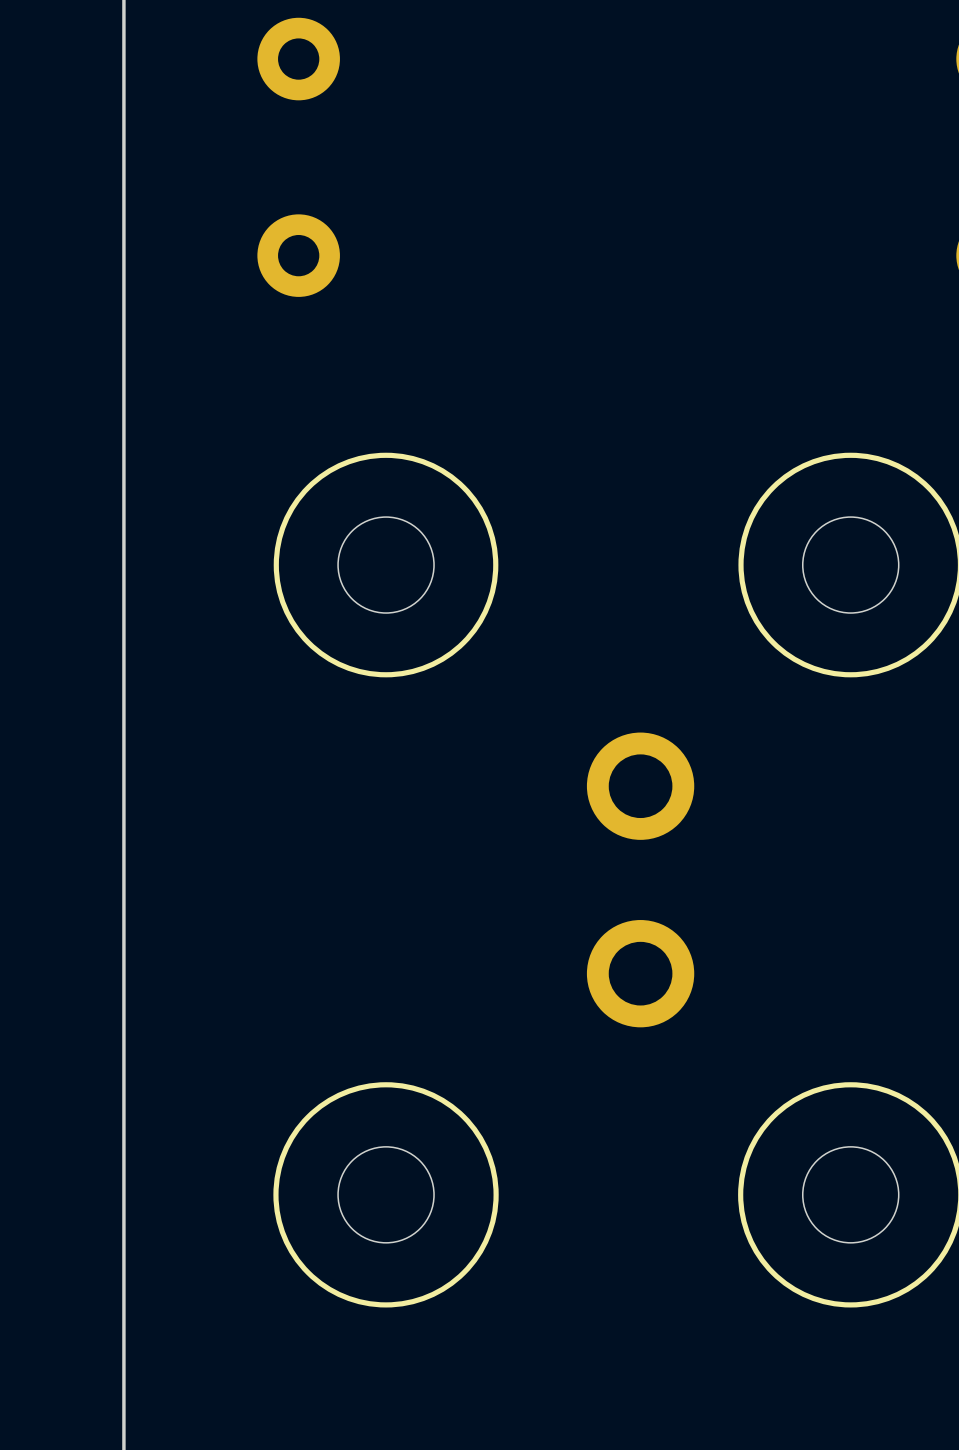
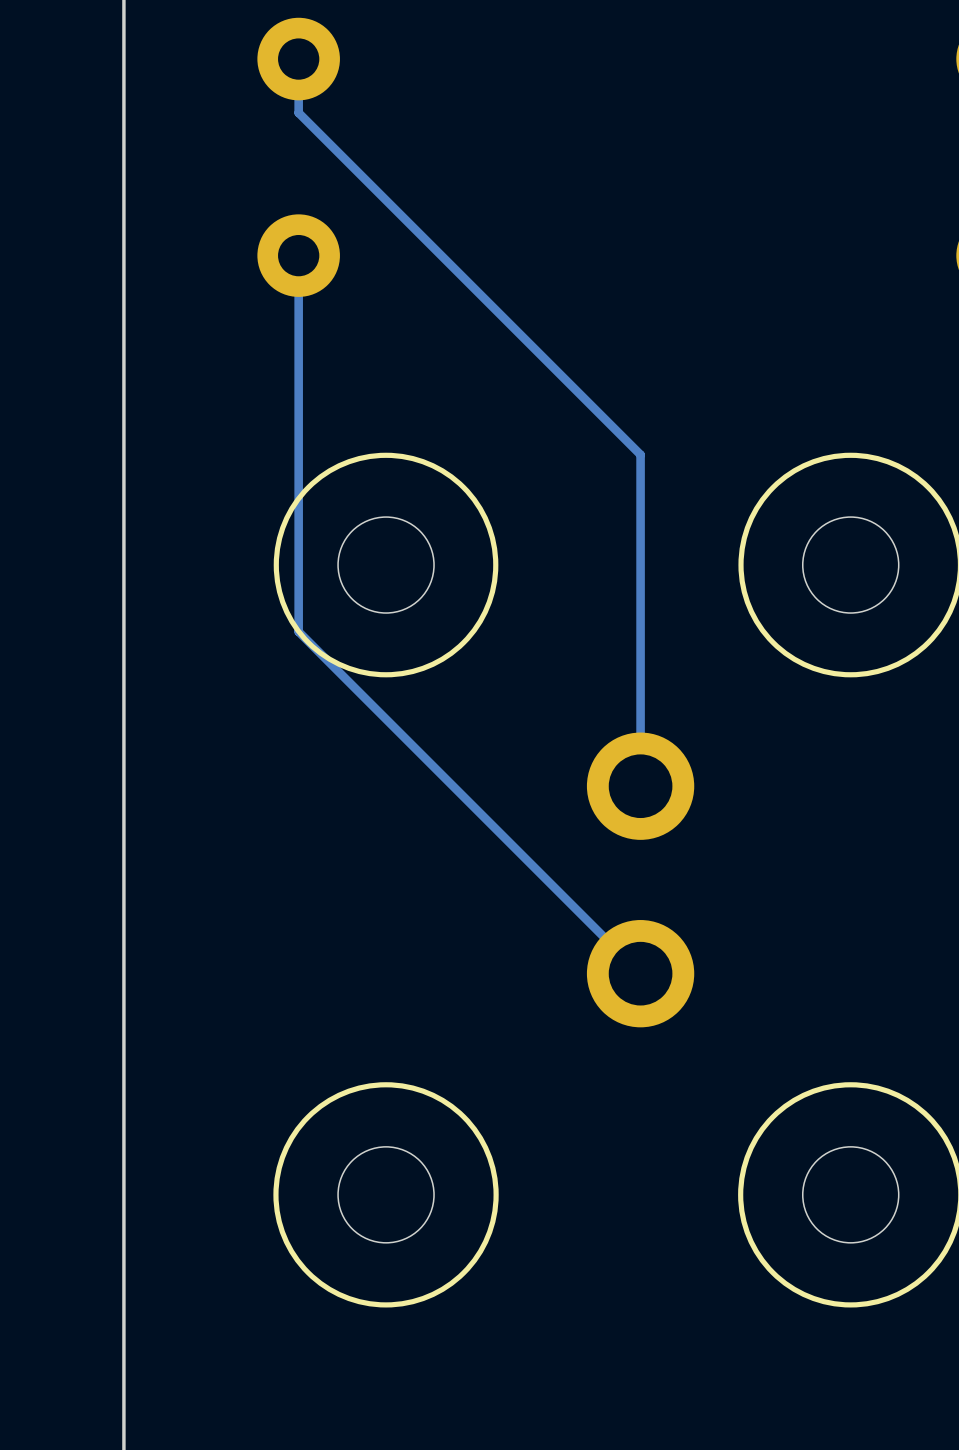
track: none -> (298, 59) (298, 112) (640, 454) (640, 786)
track: none -> (298, 255) (298, 631) (640, 973)

